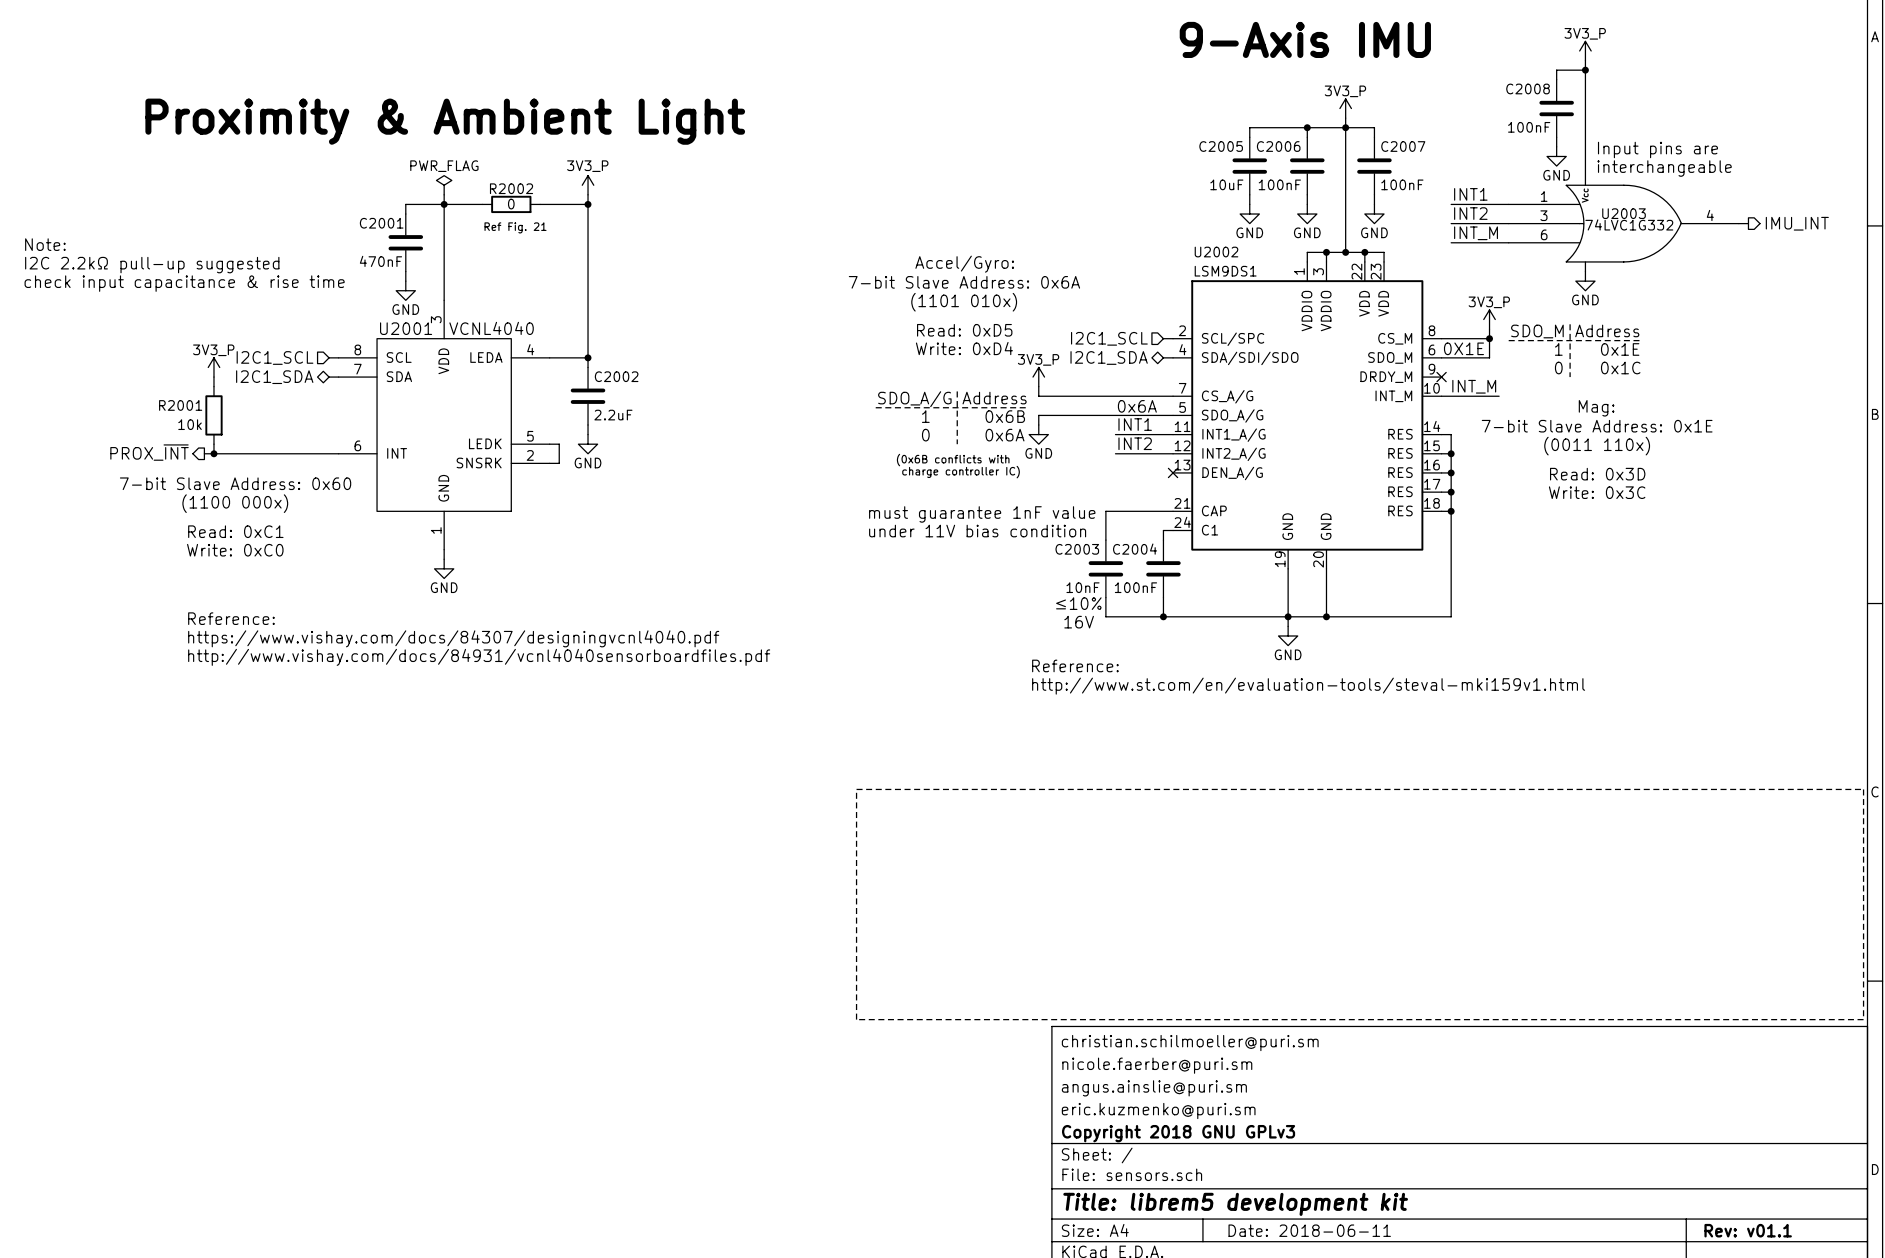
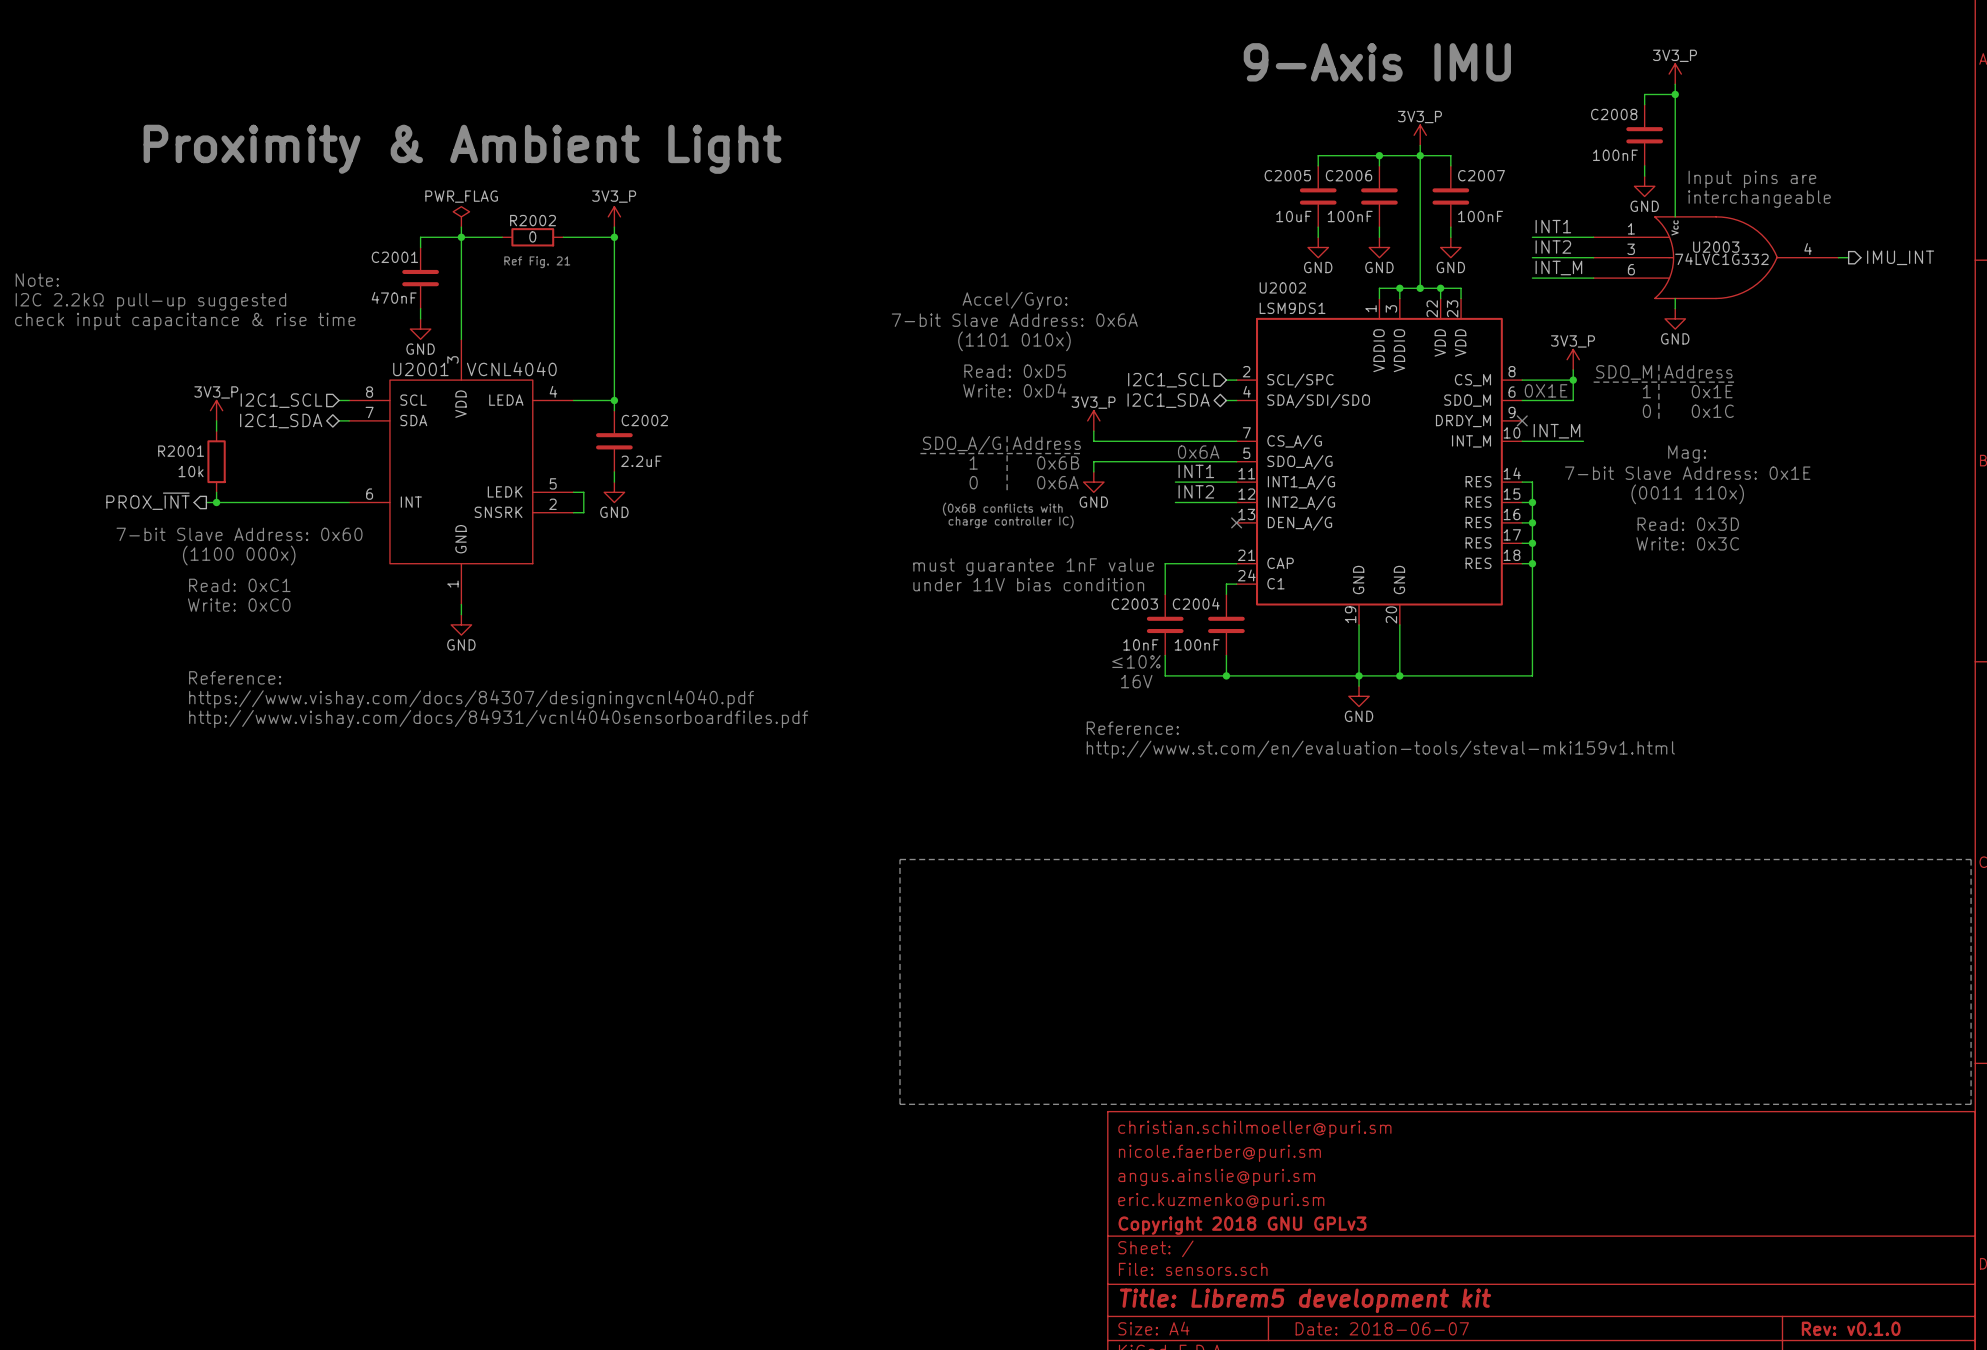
title block: Title: librem5 development kit (1235, 1204) -> Title: Librem5 development kit (1305, 1300)
title block: Date: 2018-06-11 (1309, 1230) -> Date: 2018-06-07 (1382, 1328)
title block: Rev: v01.1 (1748, 1230) -> Rev: v0.1.0 (1851, 1328)

